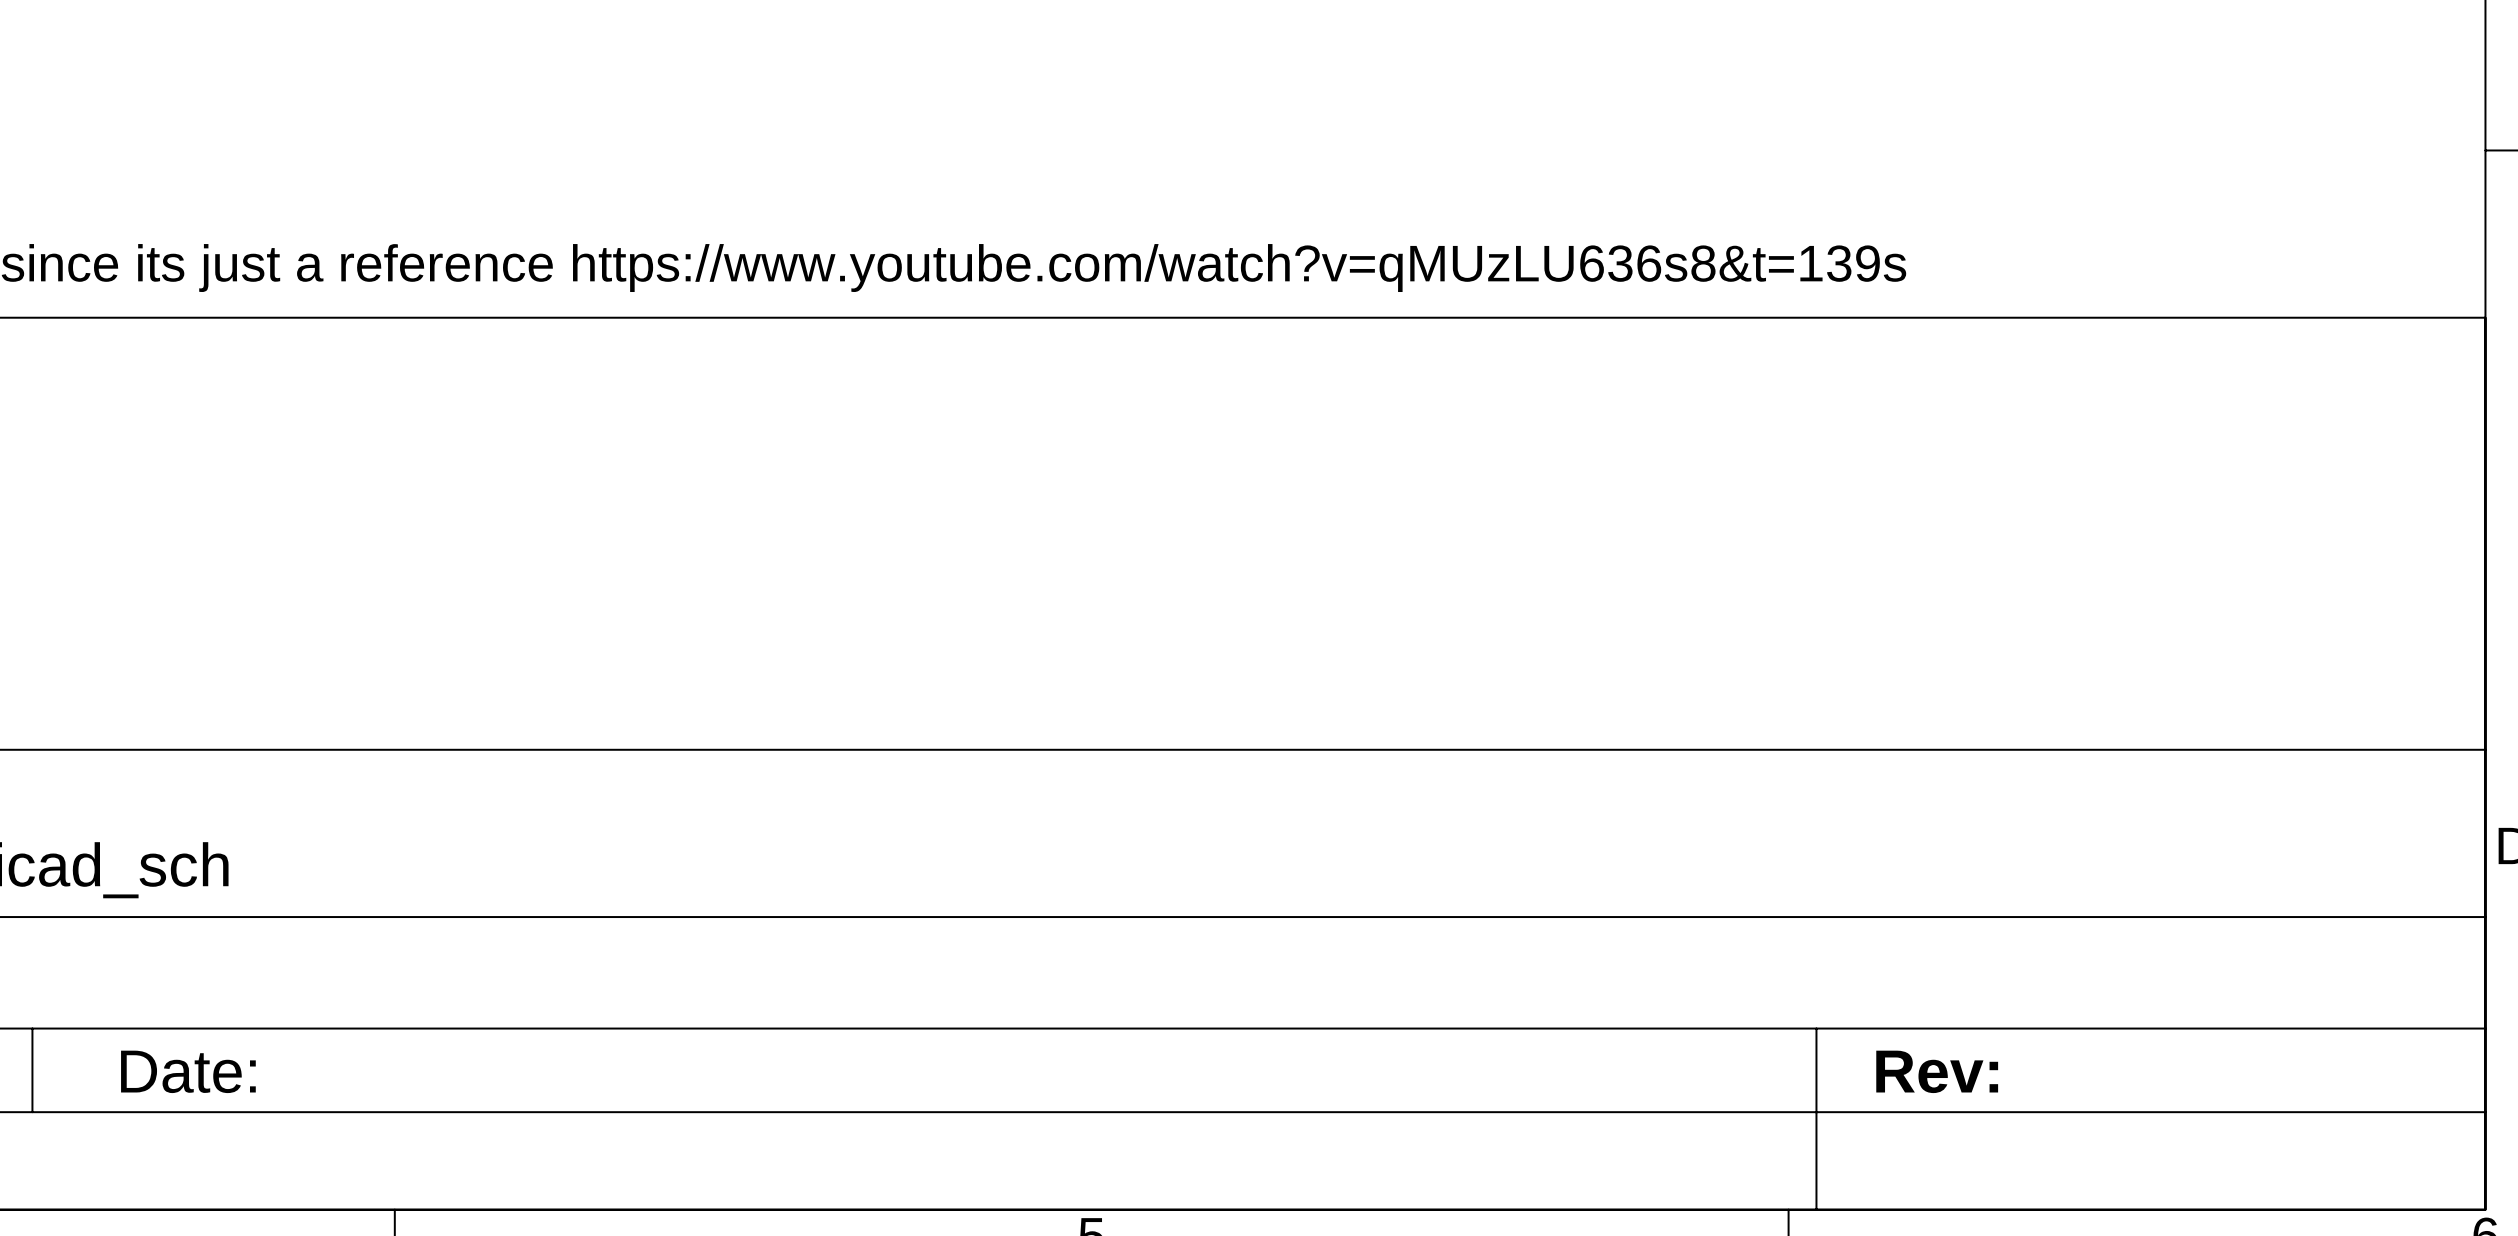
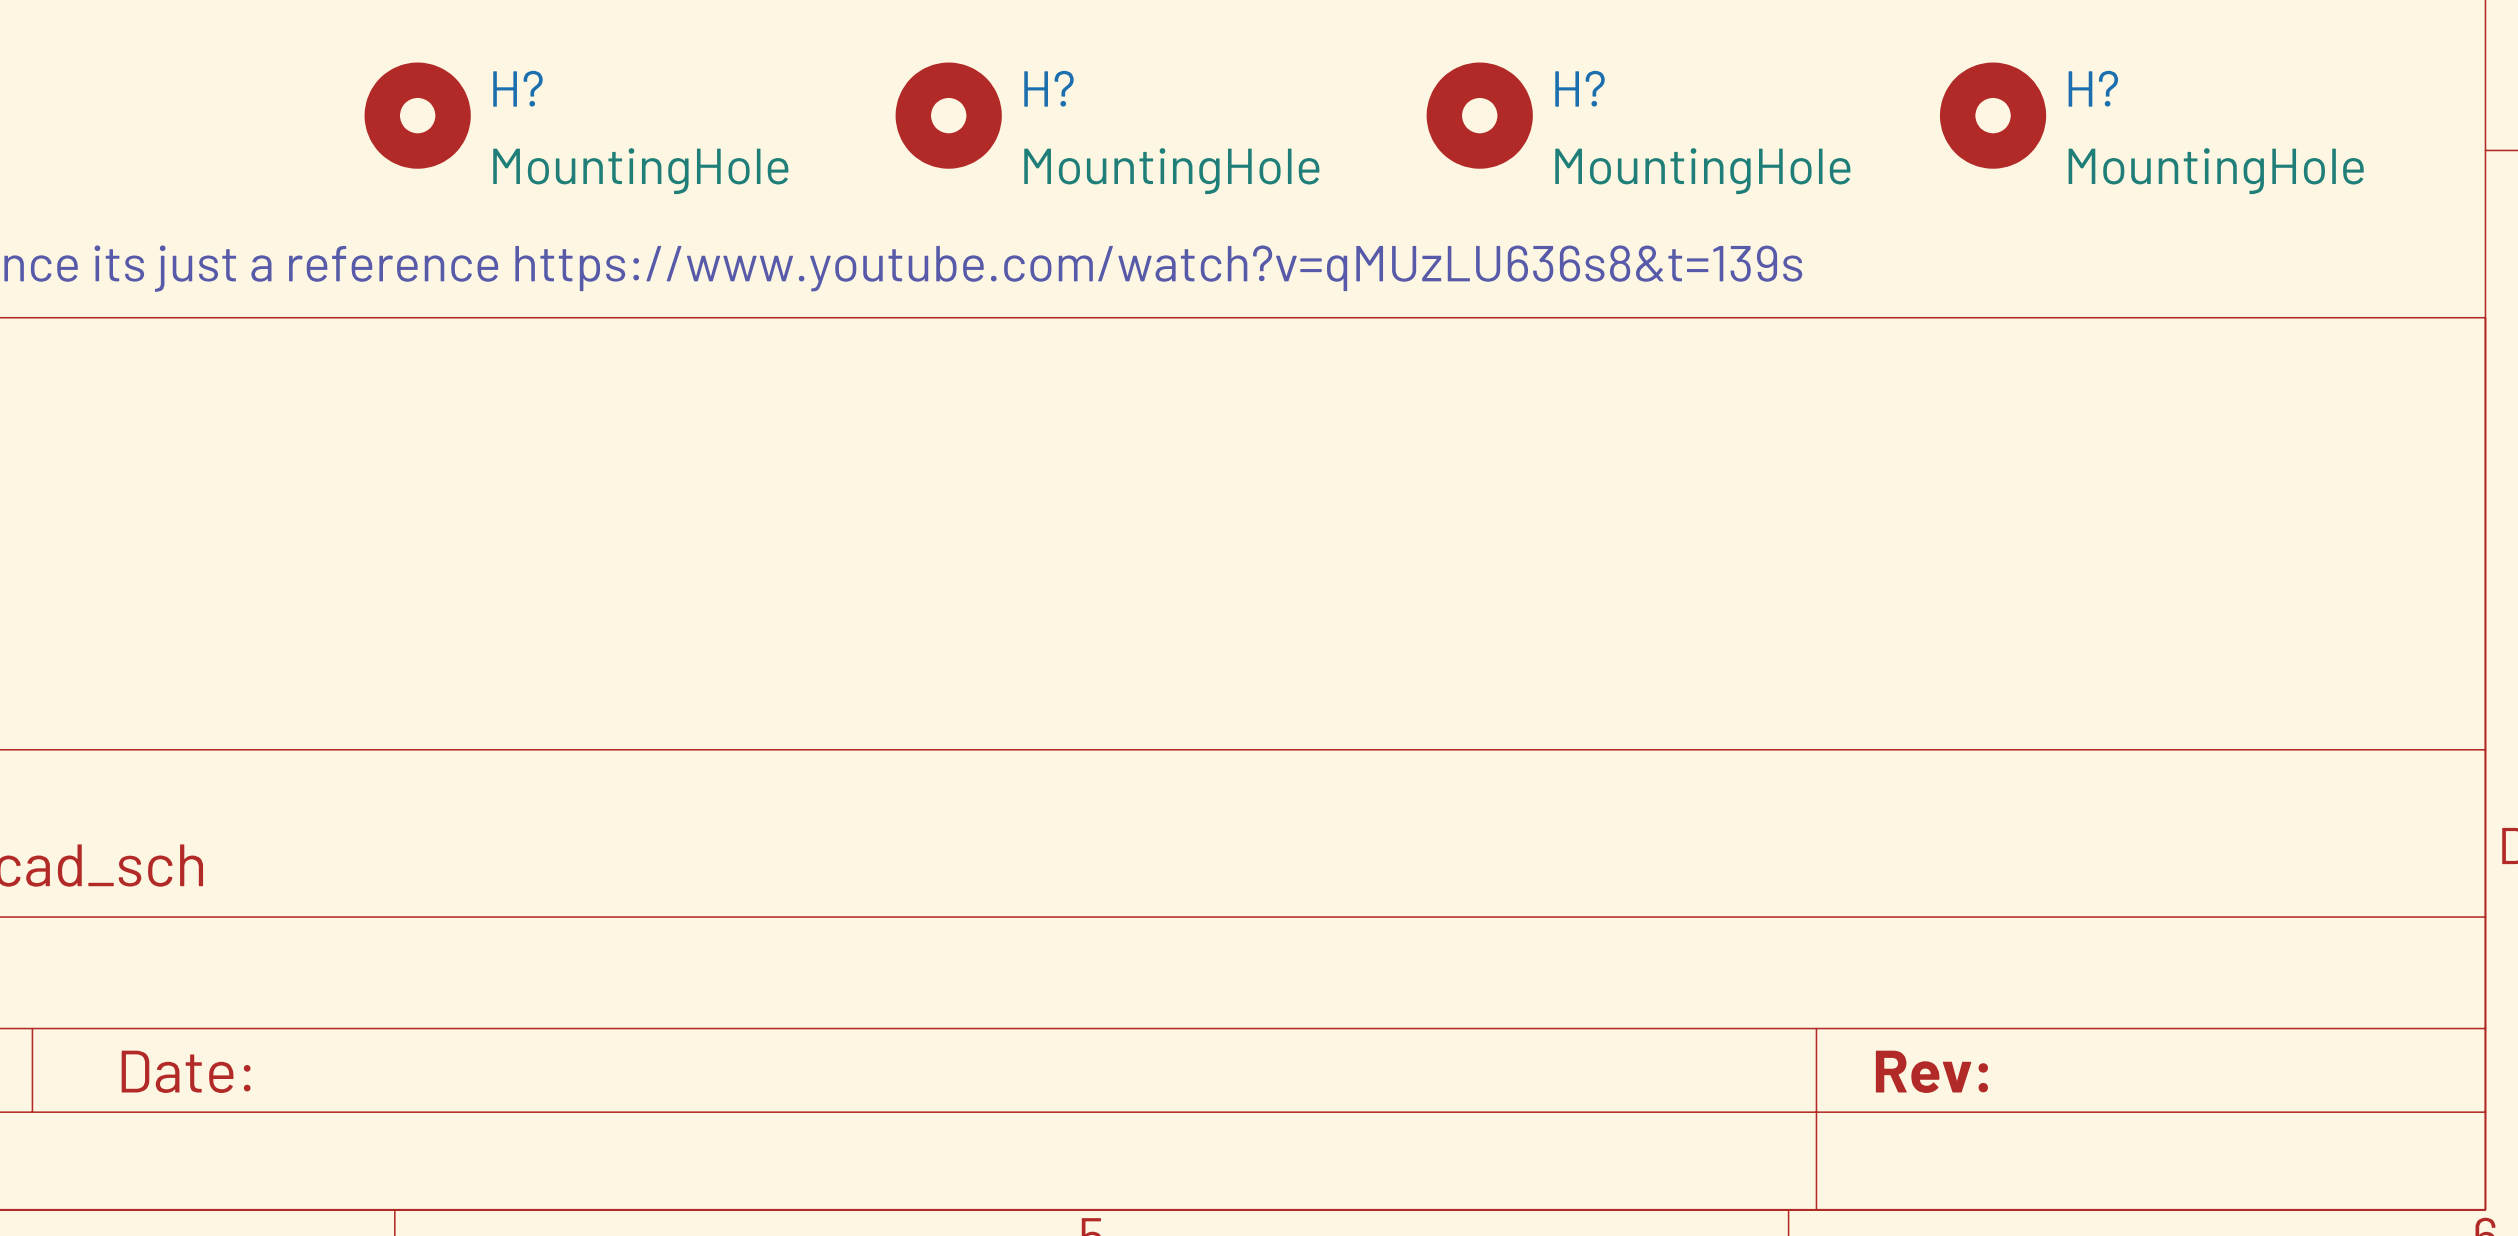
H?: none -> MountingHole (417, 115)
H?: none -> MountingHole (948, 115)
H?: none -> MountingHole (1479, 115)
H?: none -> MountingHole (1993, 115)

